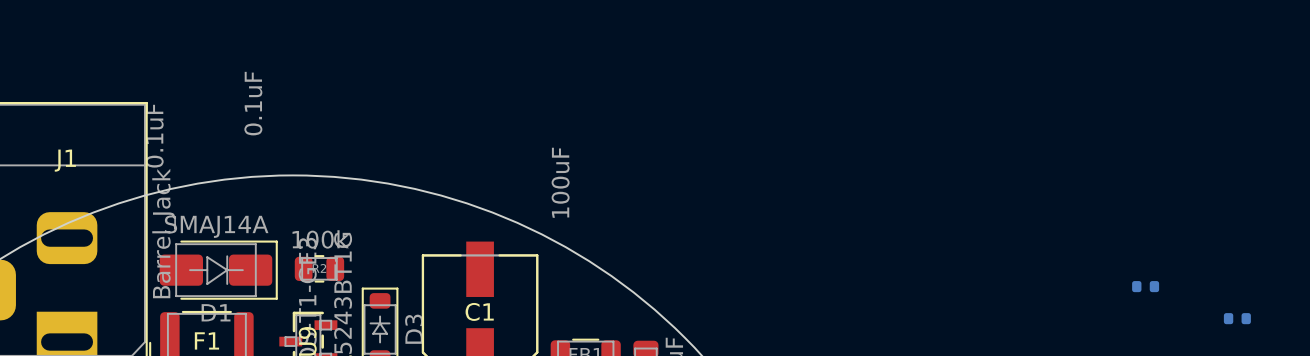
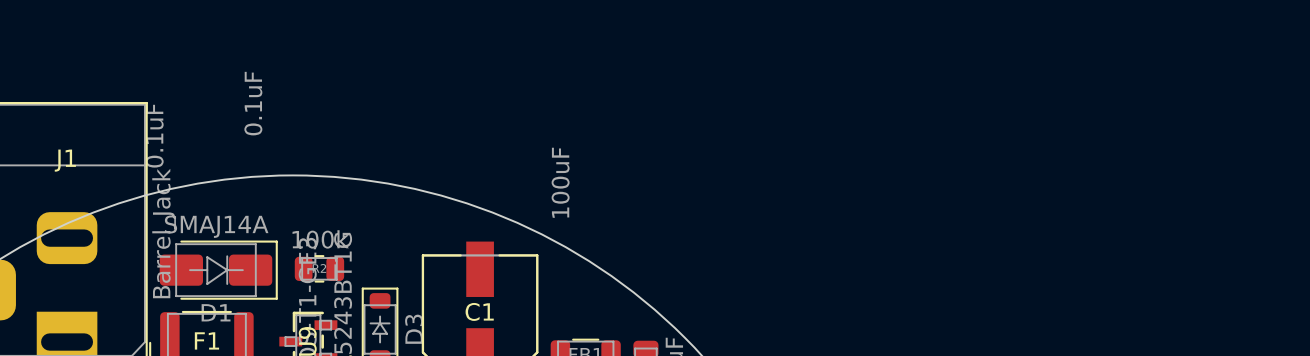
part: (1145, 286) -> none
part: (1237, 318) -> none

